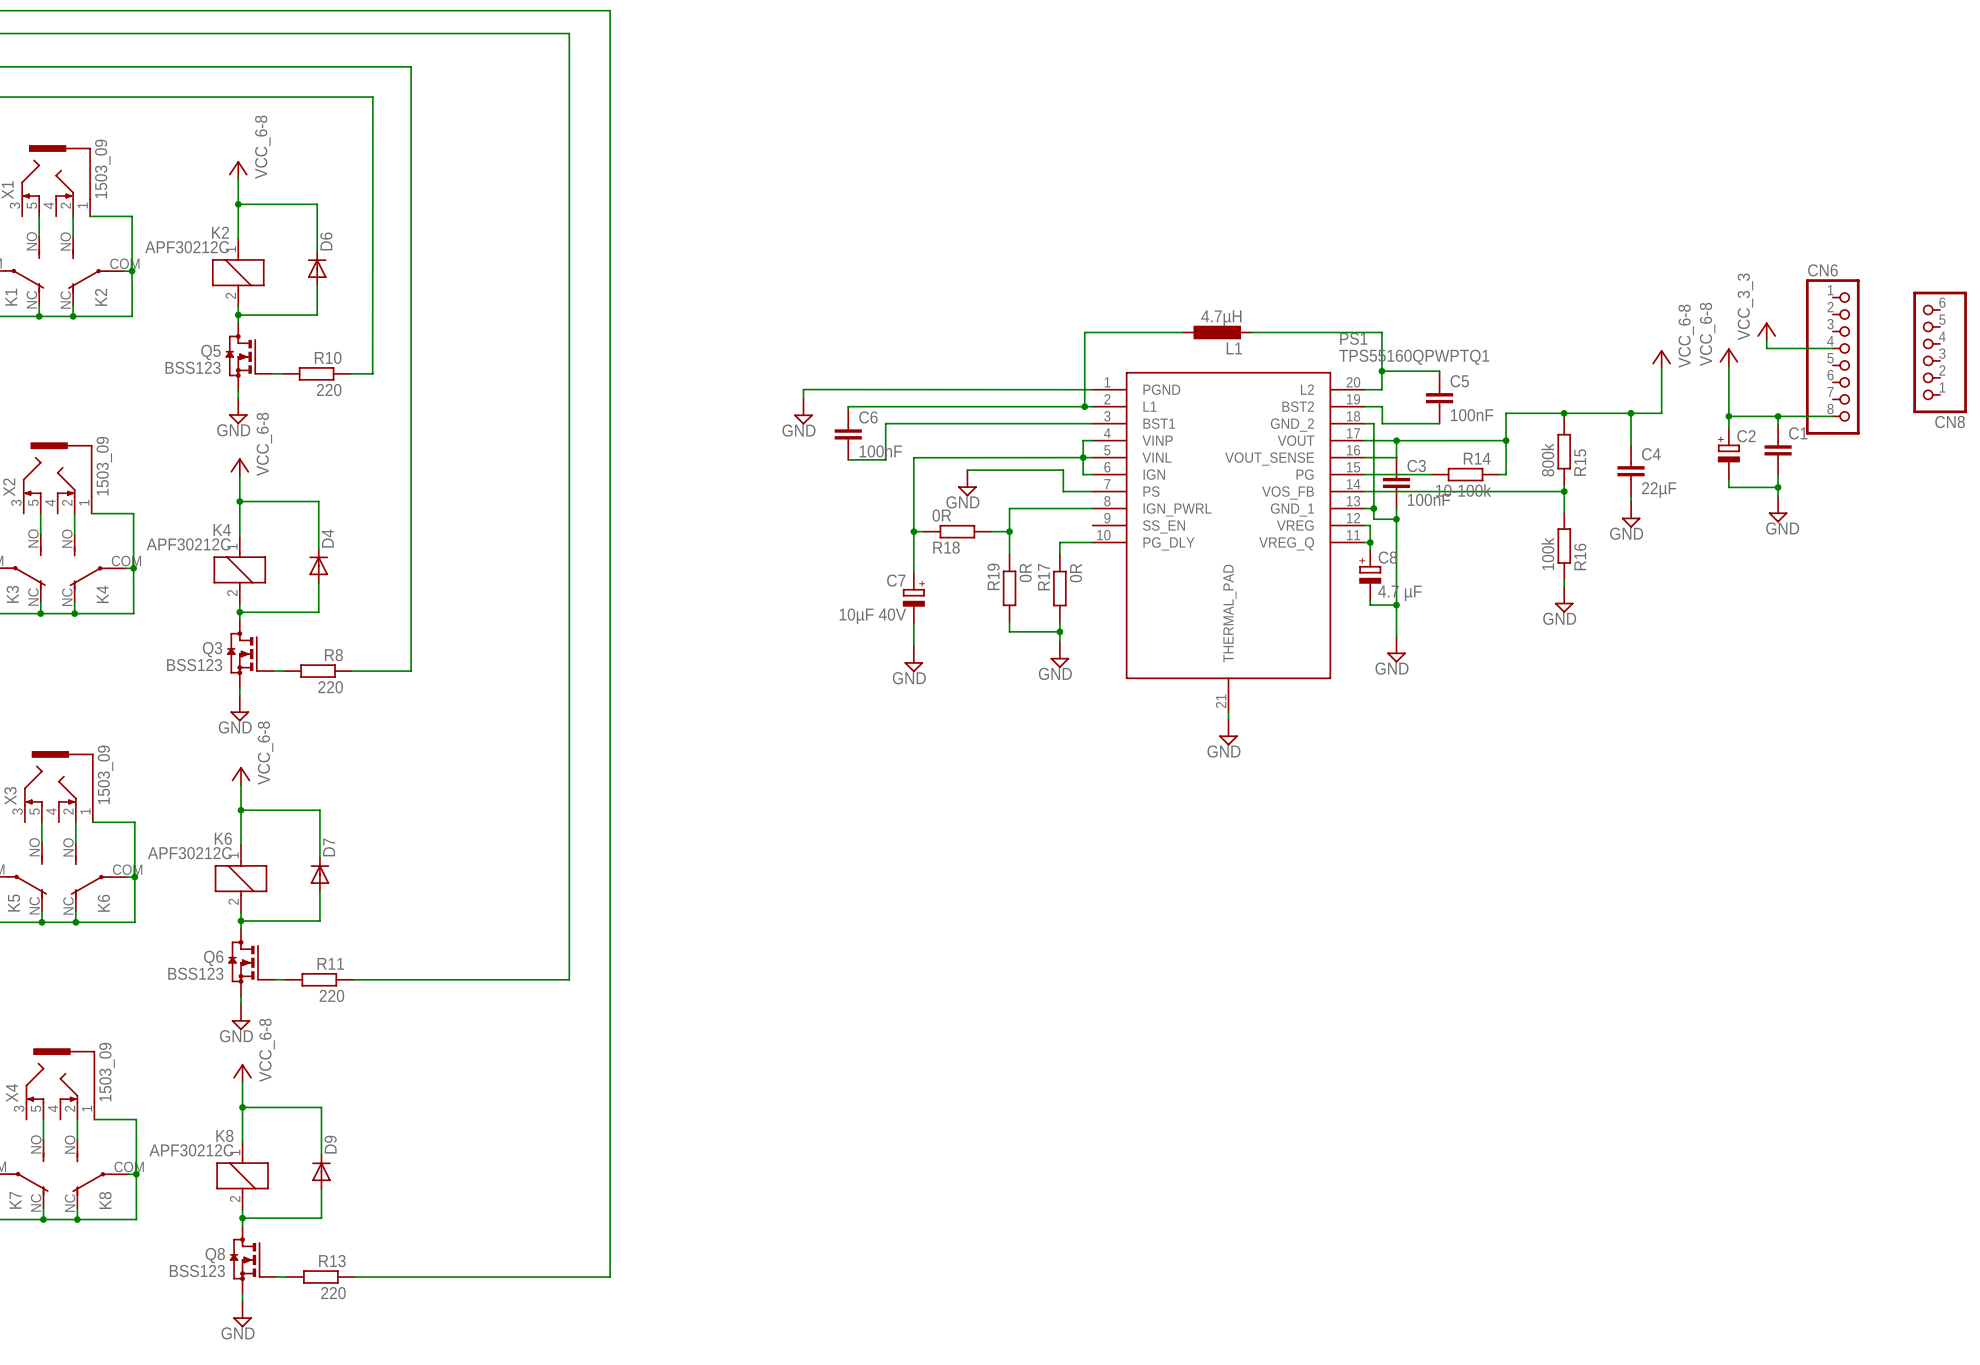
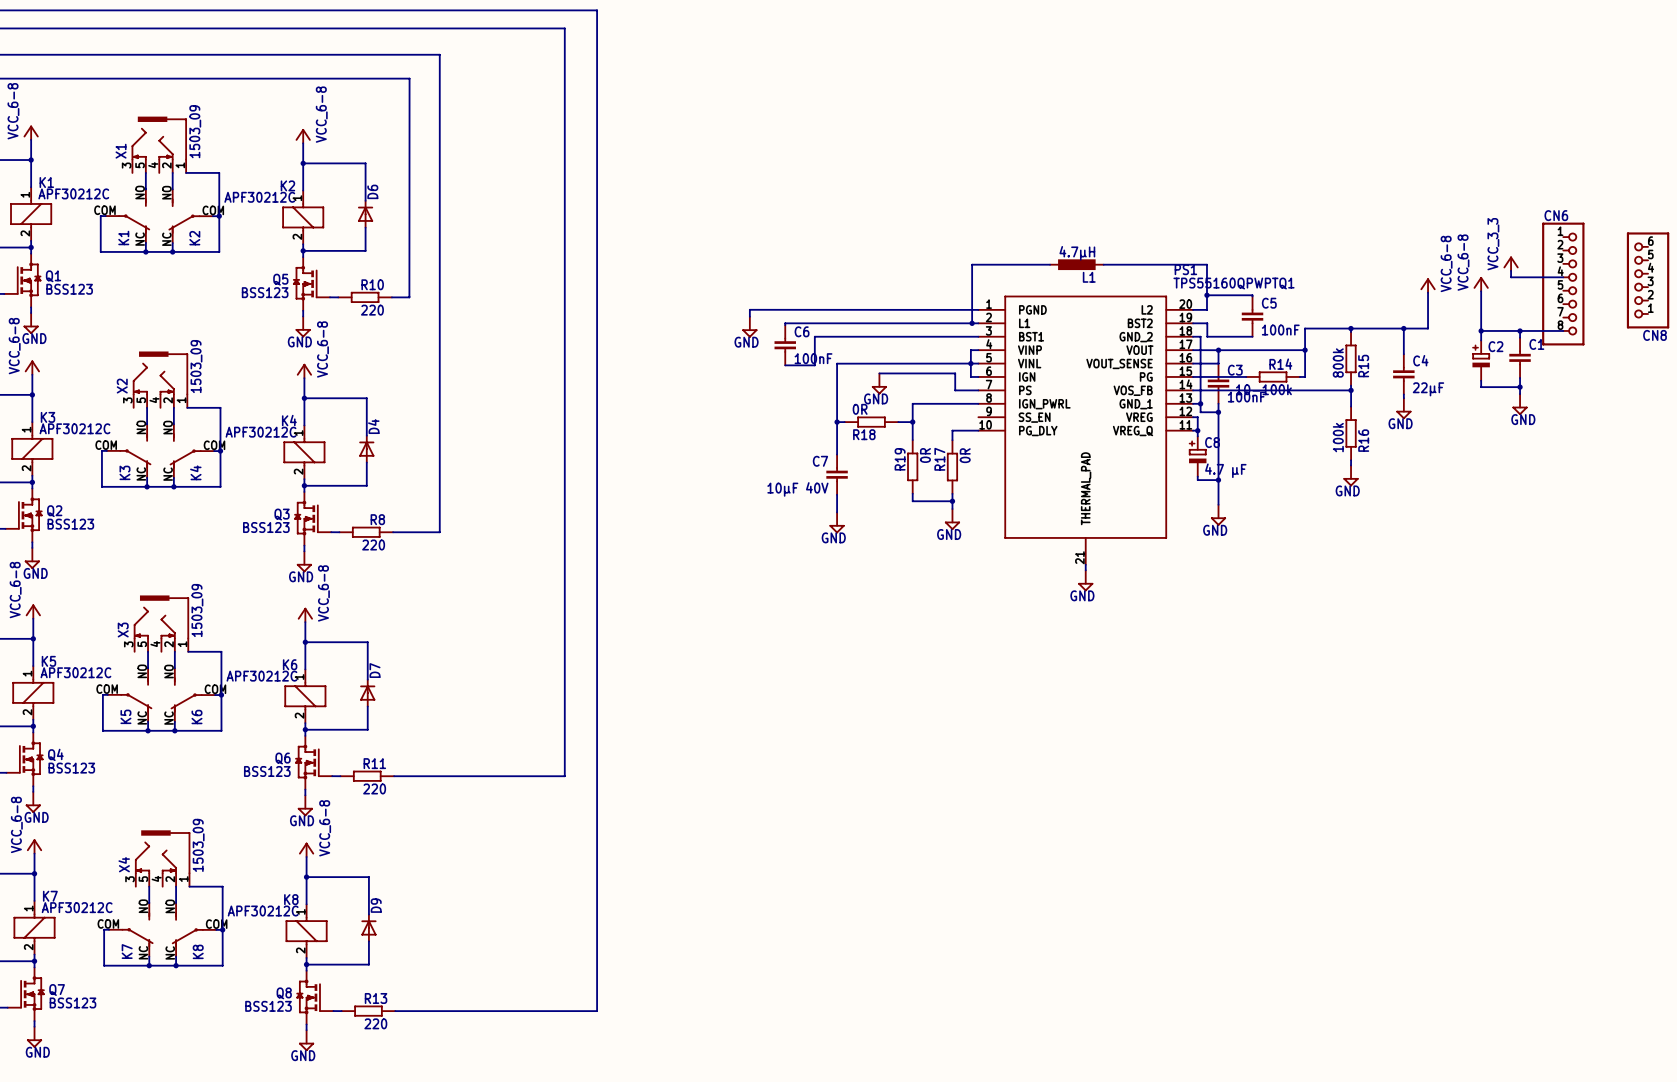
C7 symbol: [902, 572, 925, 624] -> [826, 454, 848, 495]

